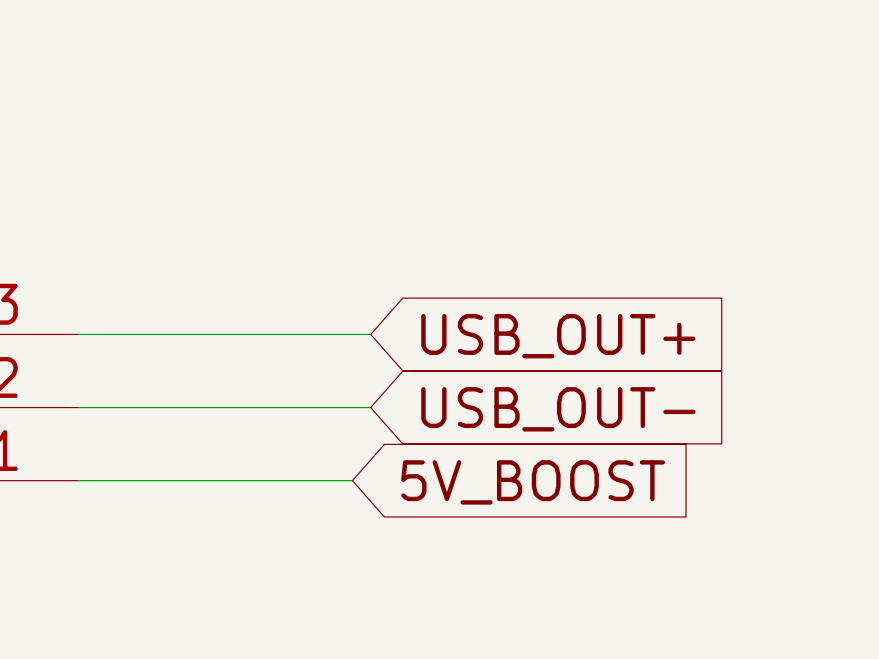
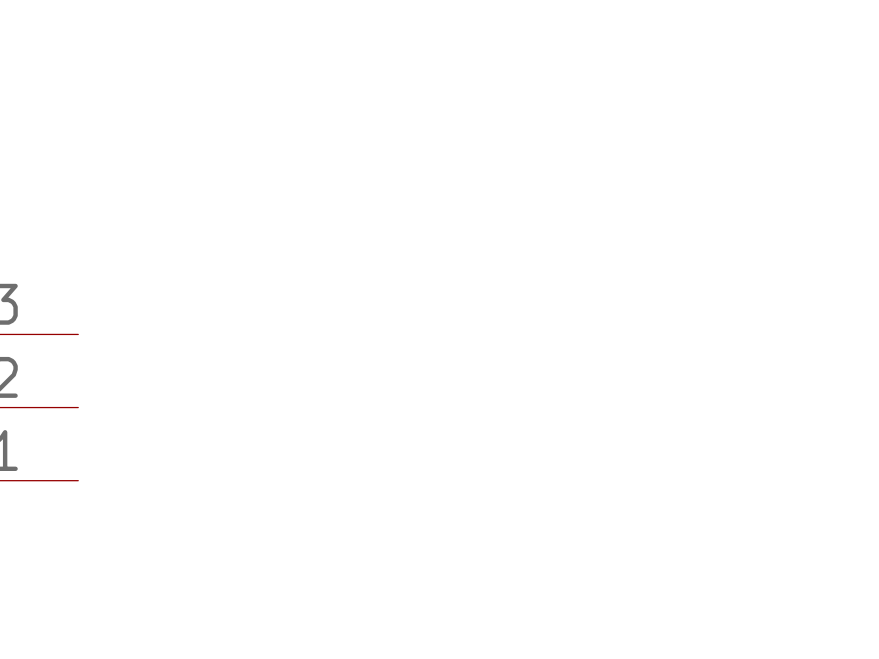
wire: (78, 334) (370, 334) -> none
global label: USB_OUT+ (558, 336) -> none
wire: (78, 407) (370, 407) -> none
global label: USB_OUT- (558, 409) -> none
wire: (78, 480) (352, 480) -> none
global label: 5V_BOOST (533, 482) -> none

